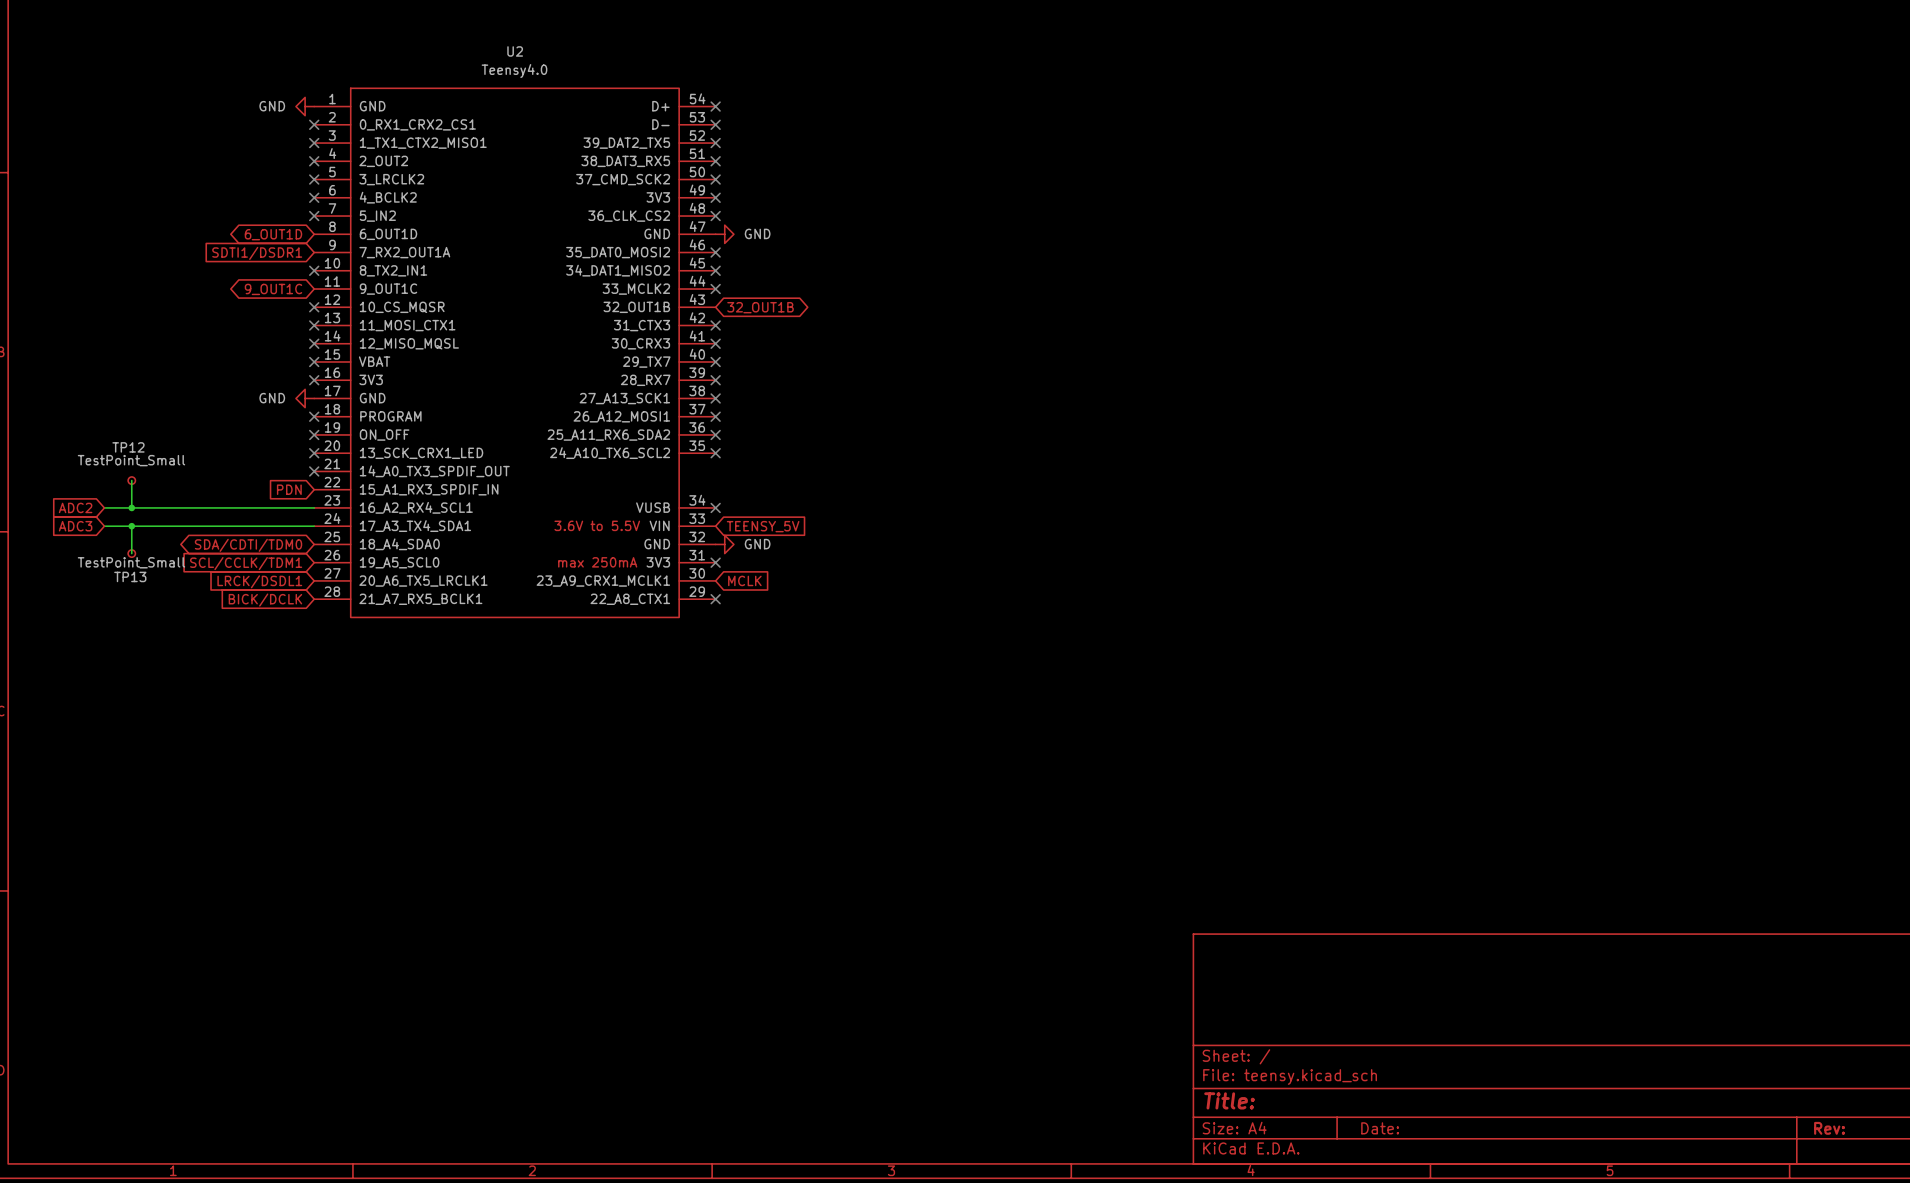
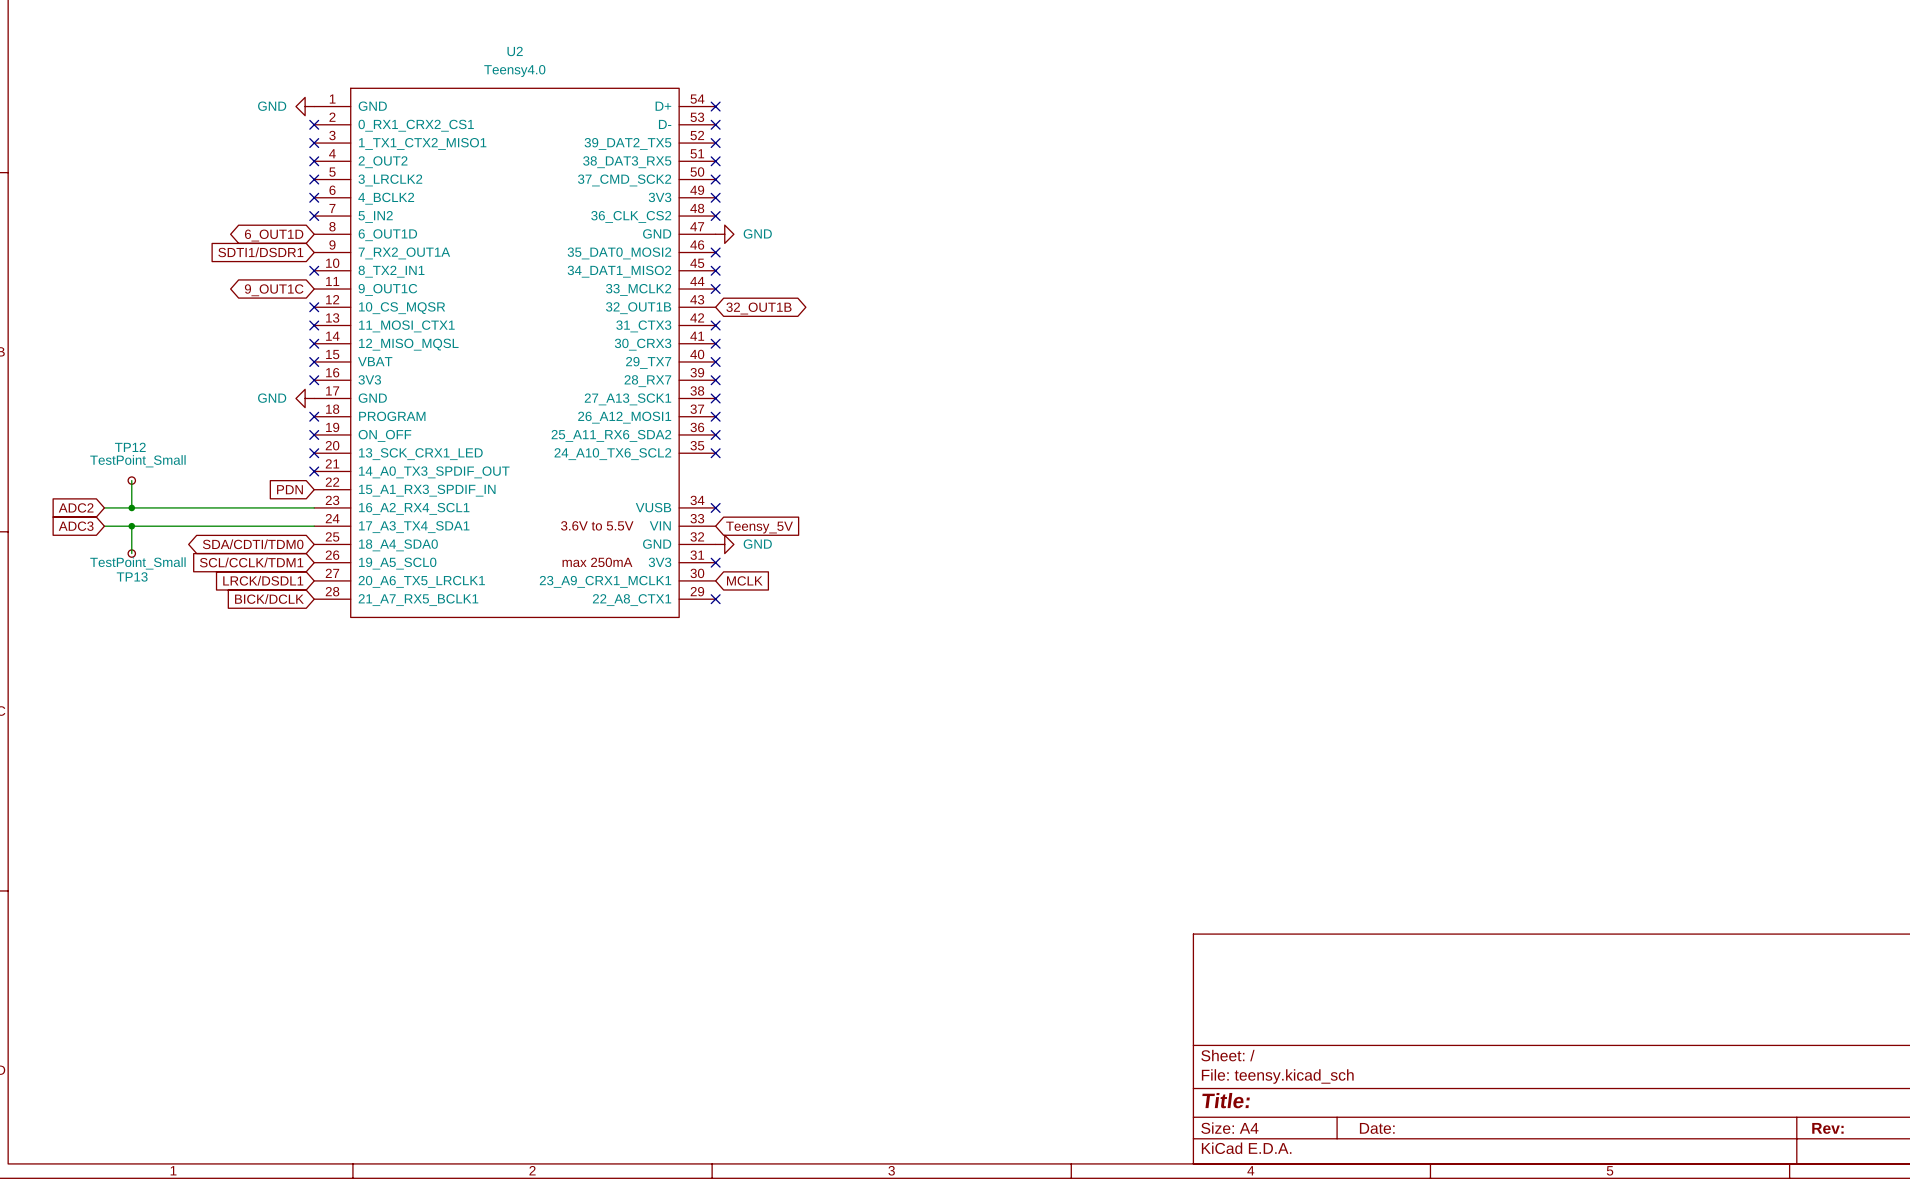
global label: TEENSY_5V (763, 526) -> Teensy_5V (759, 527)

